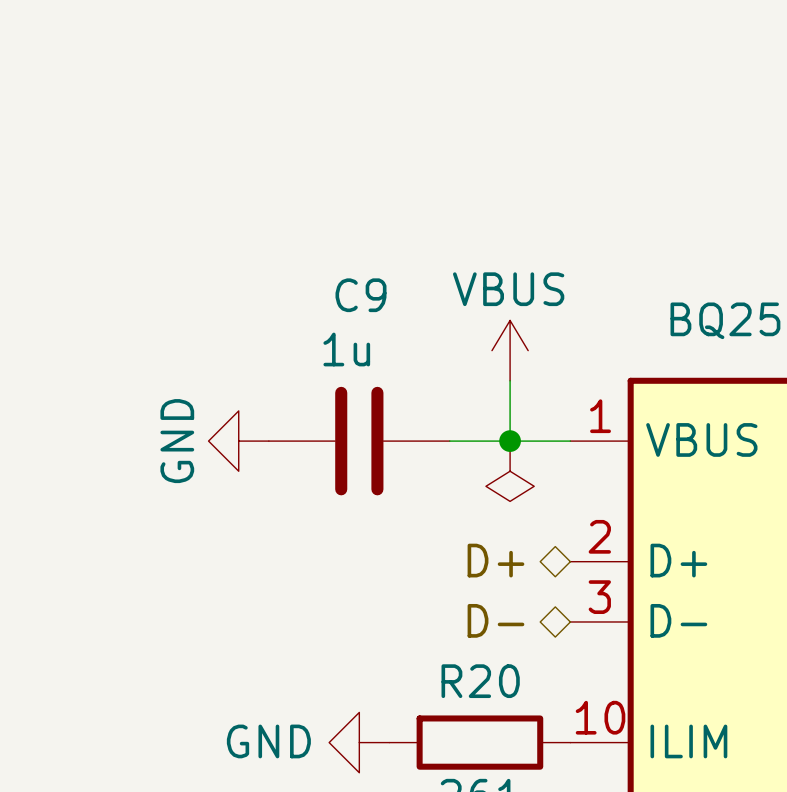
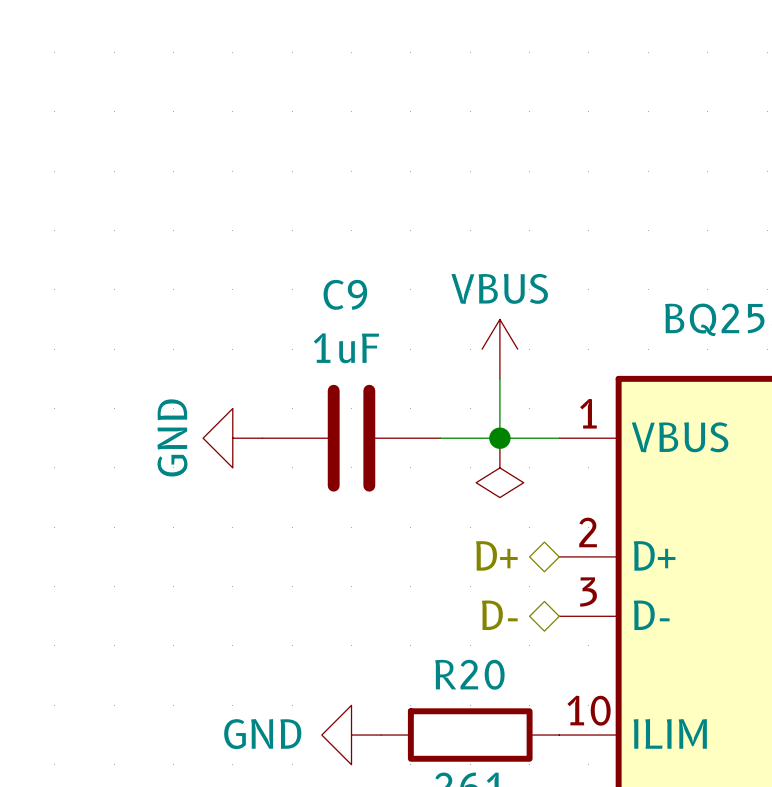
C9 value: 1u (346, 349) -> 1uF (346, 348)

